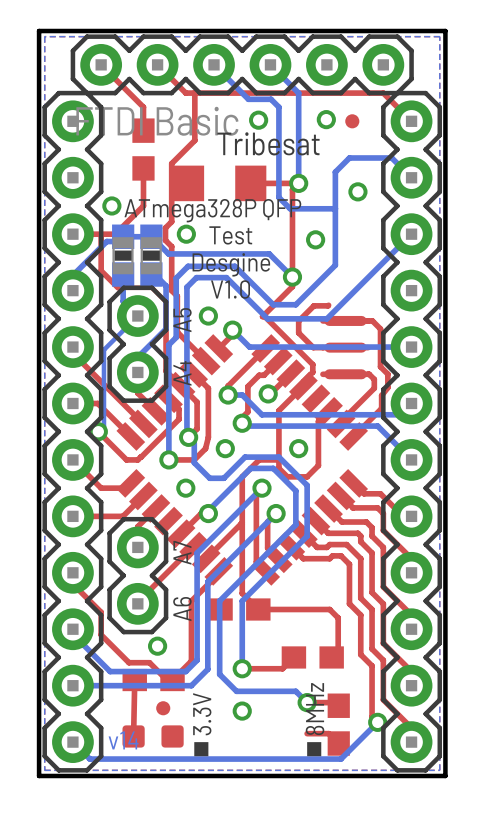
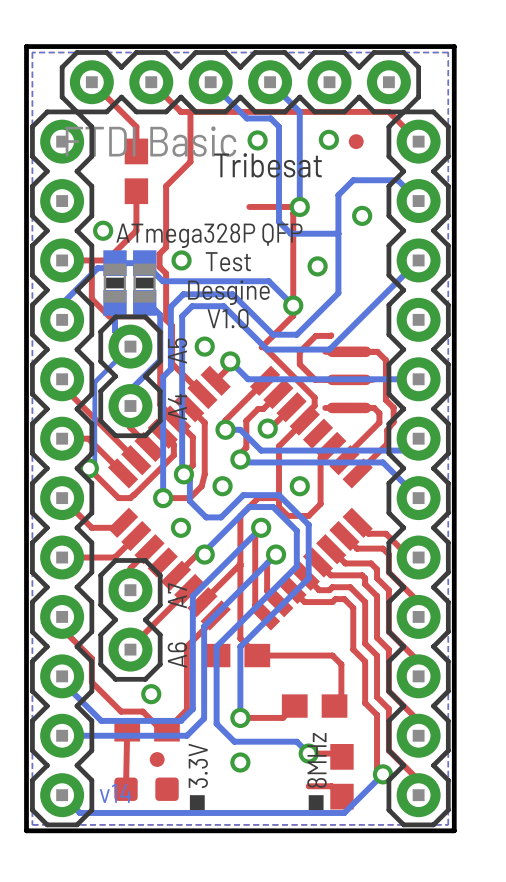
part: (219, 183) -> none

